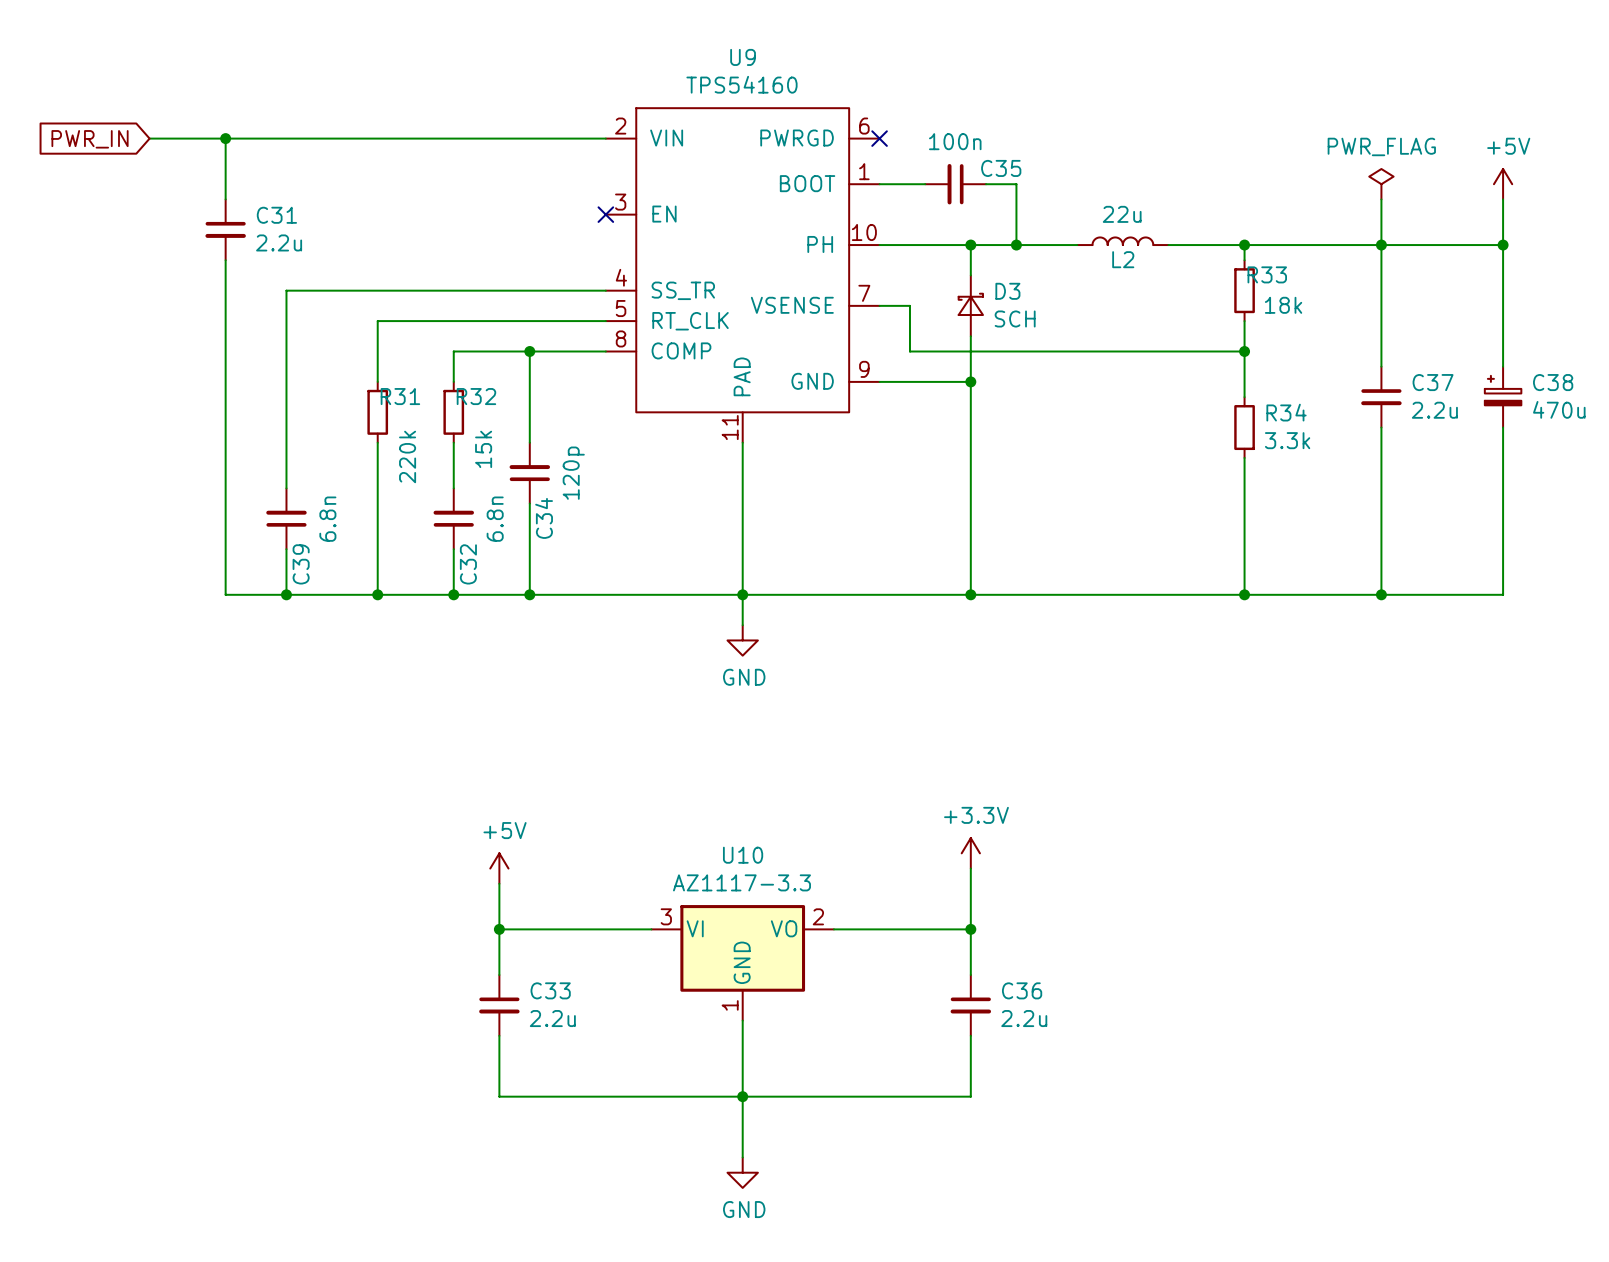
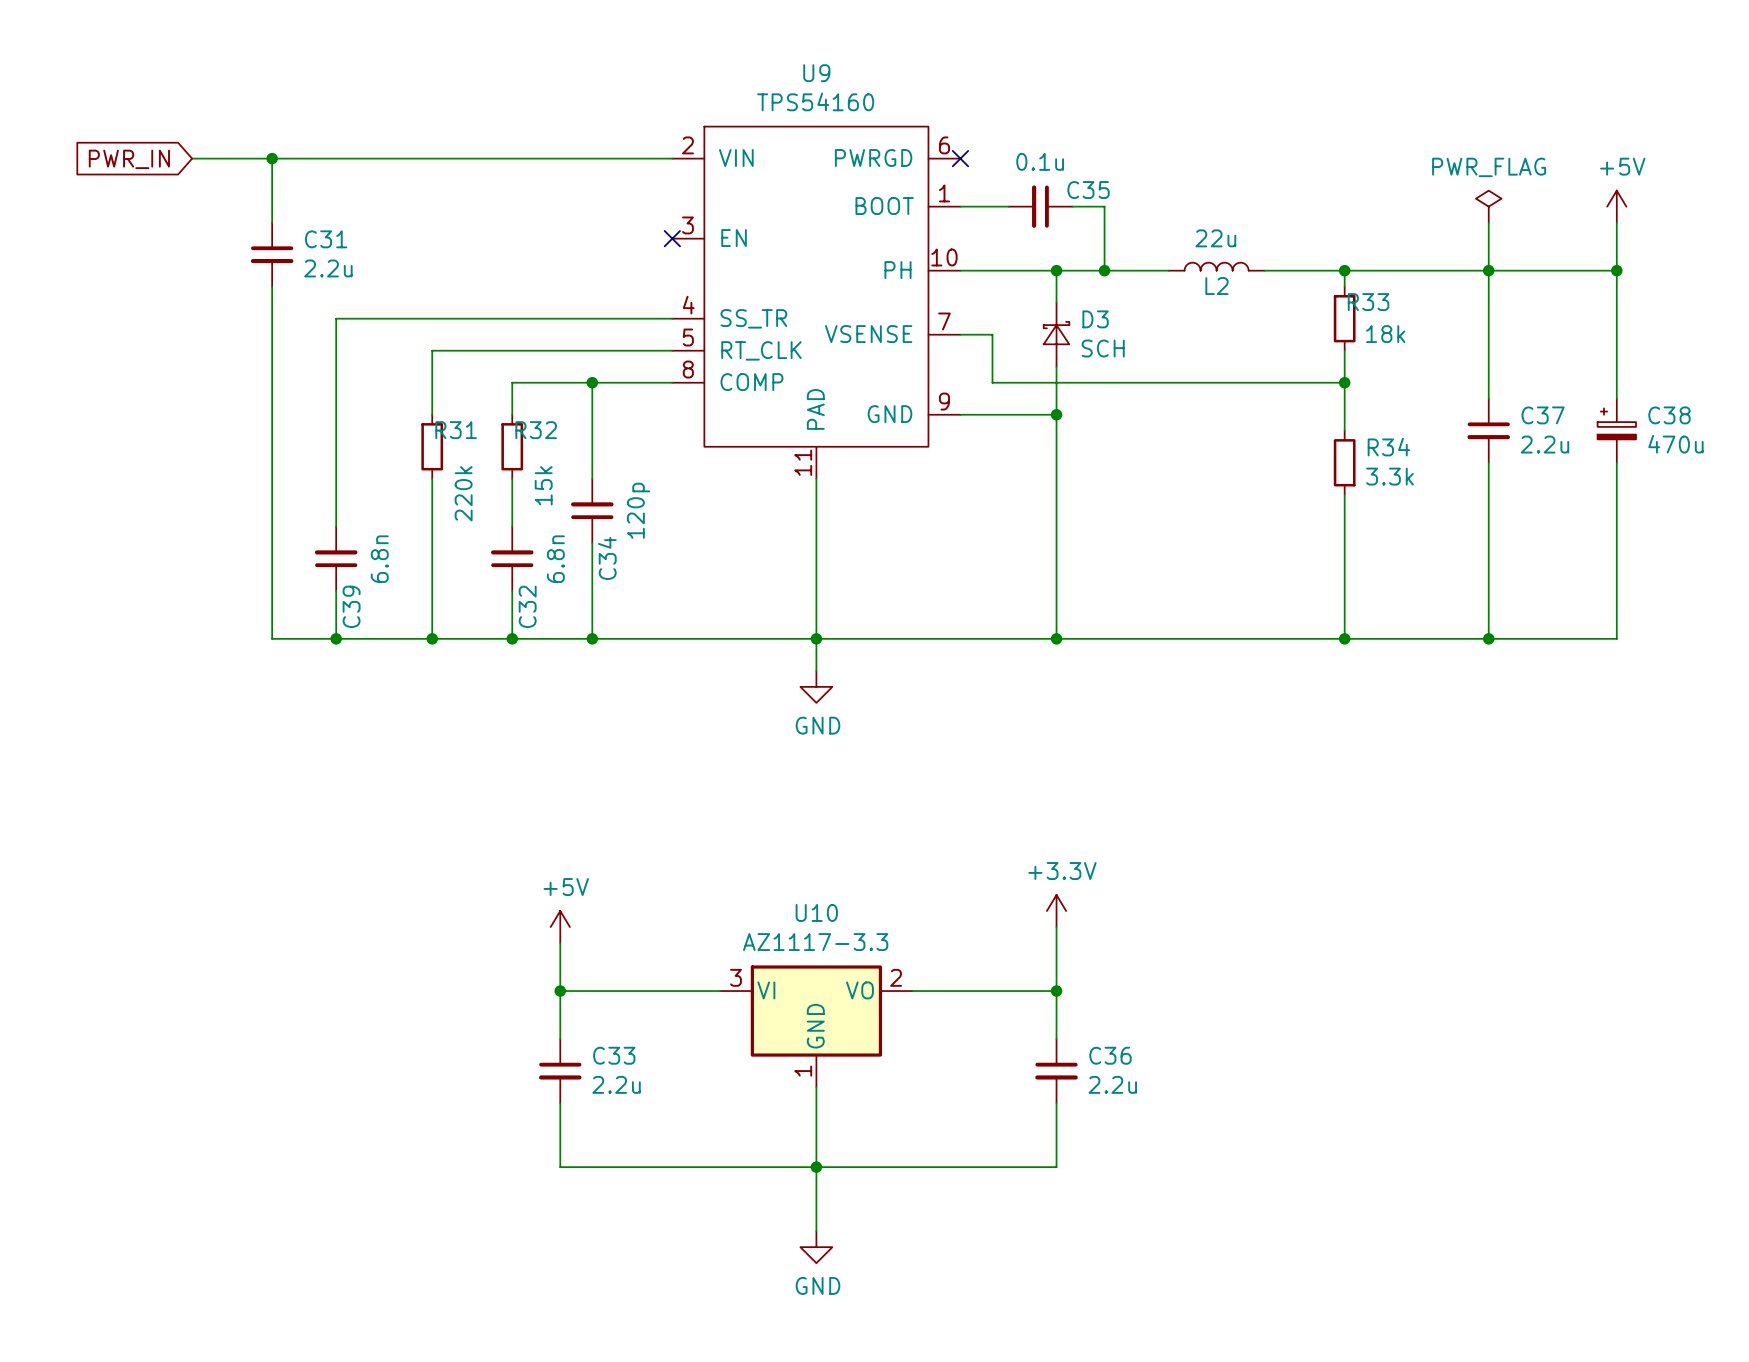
C35 value: 100n (955, 141) -> 0.1u (1040, 161)

